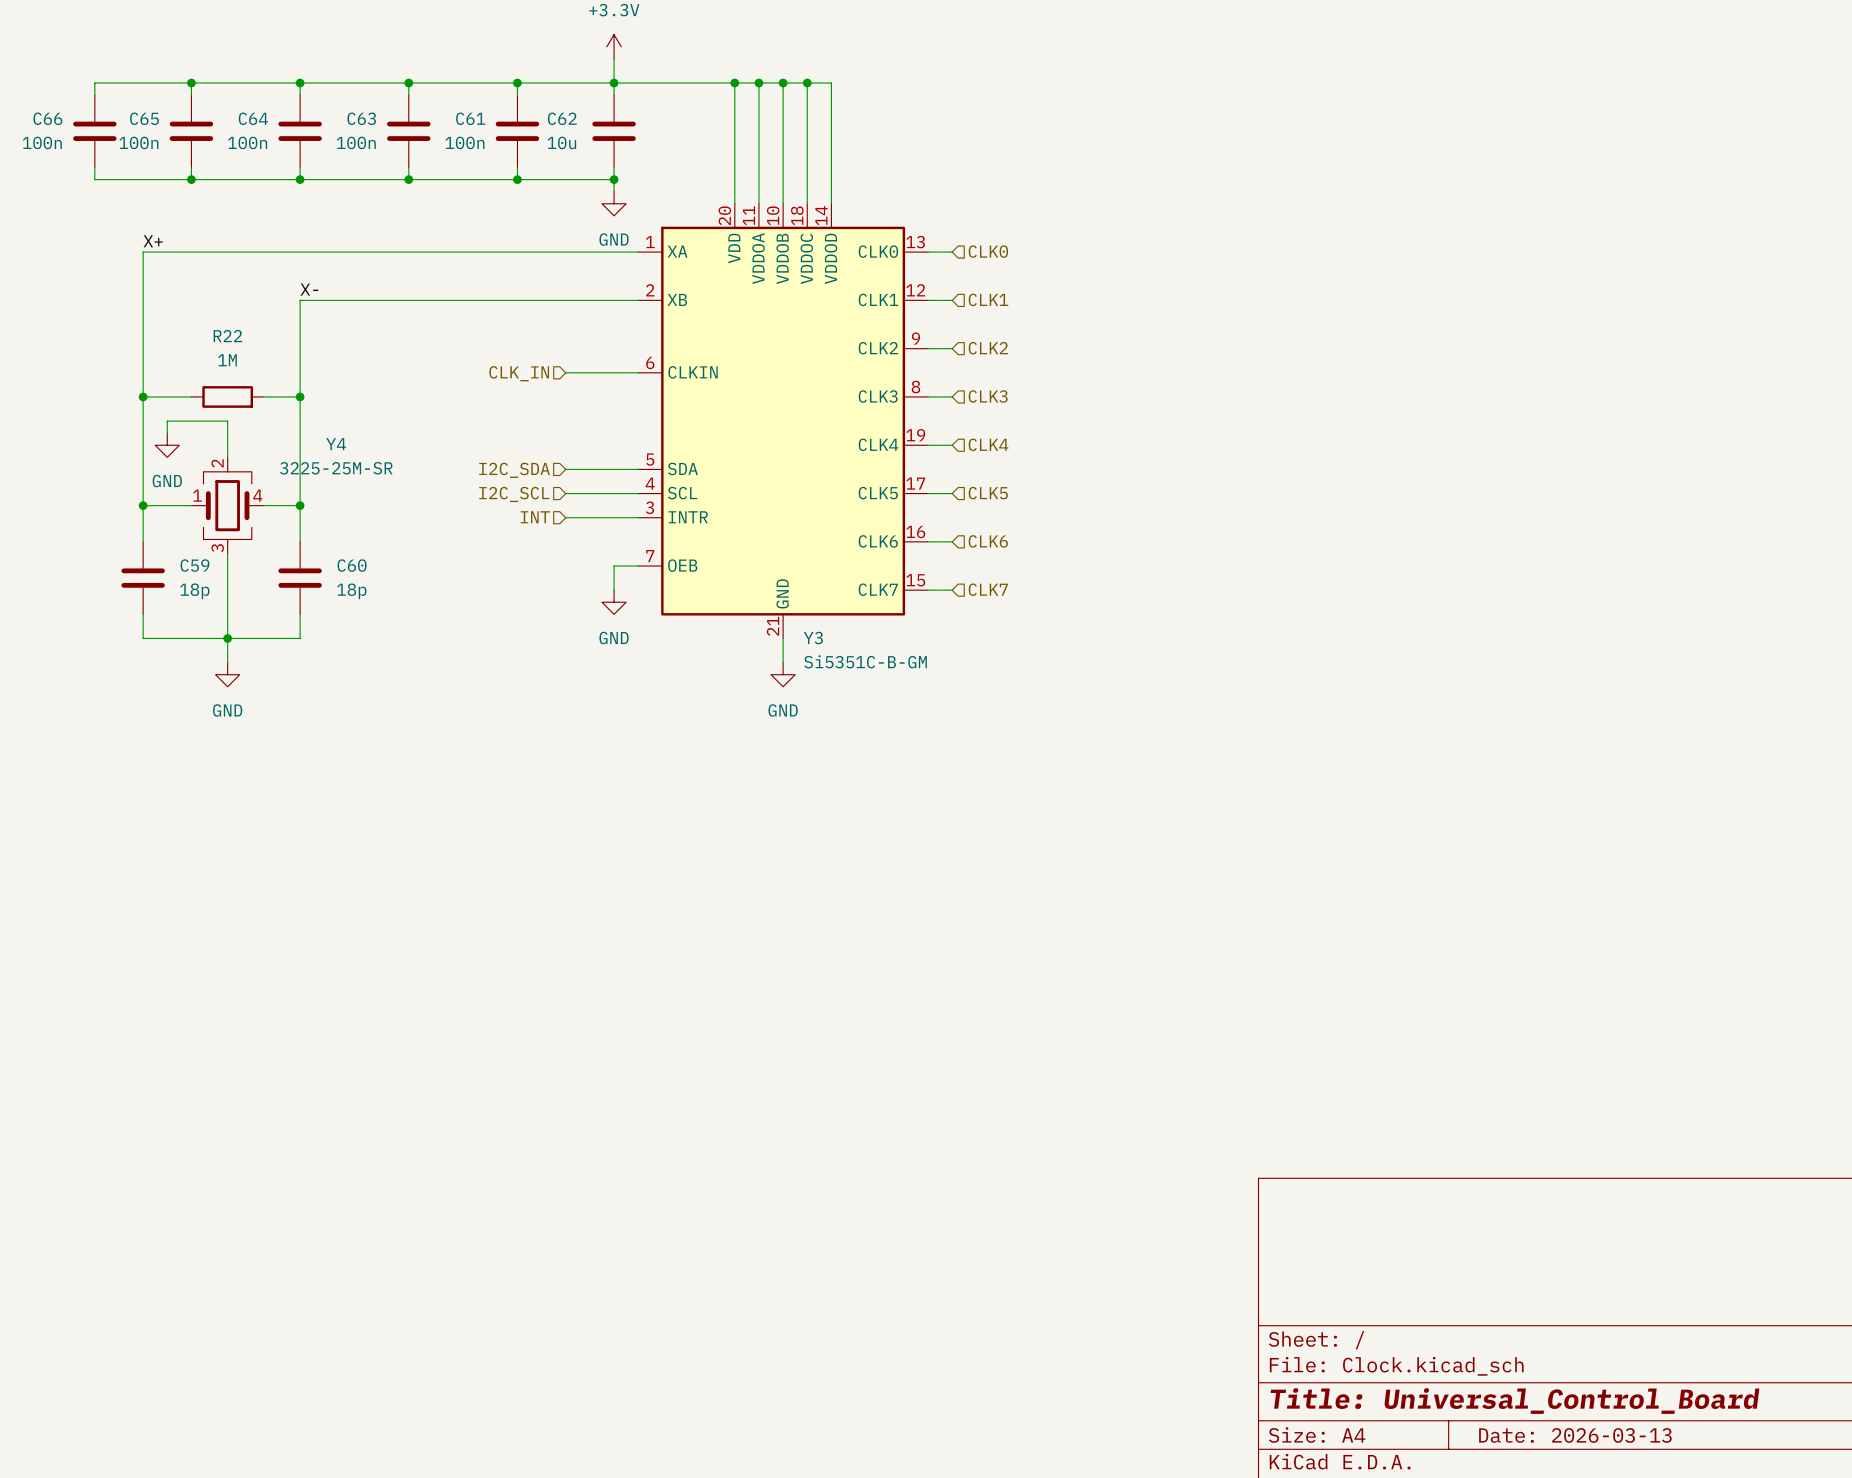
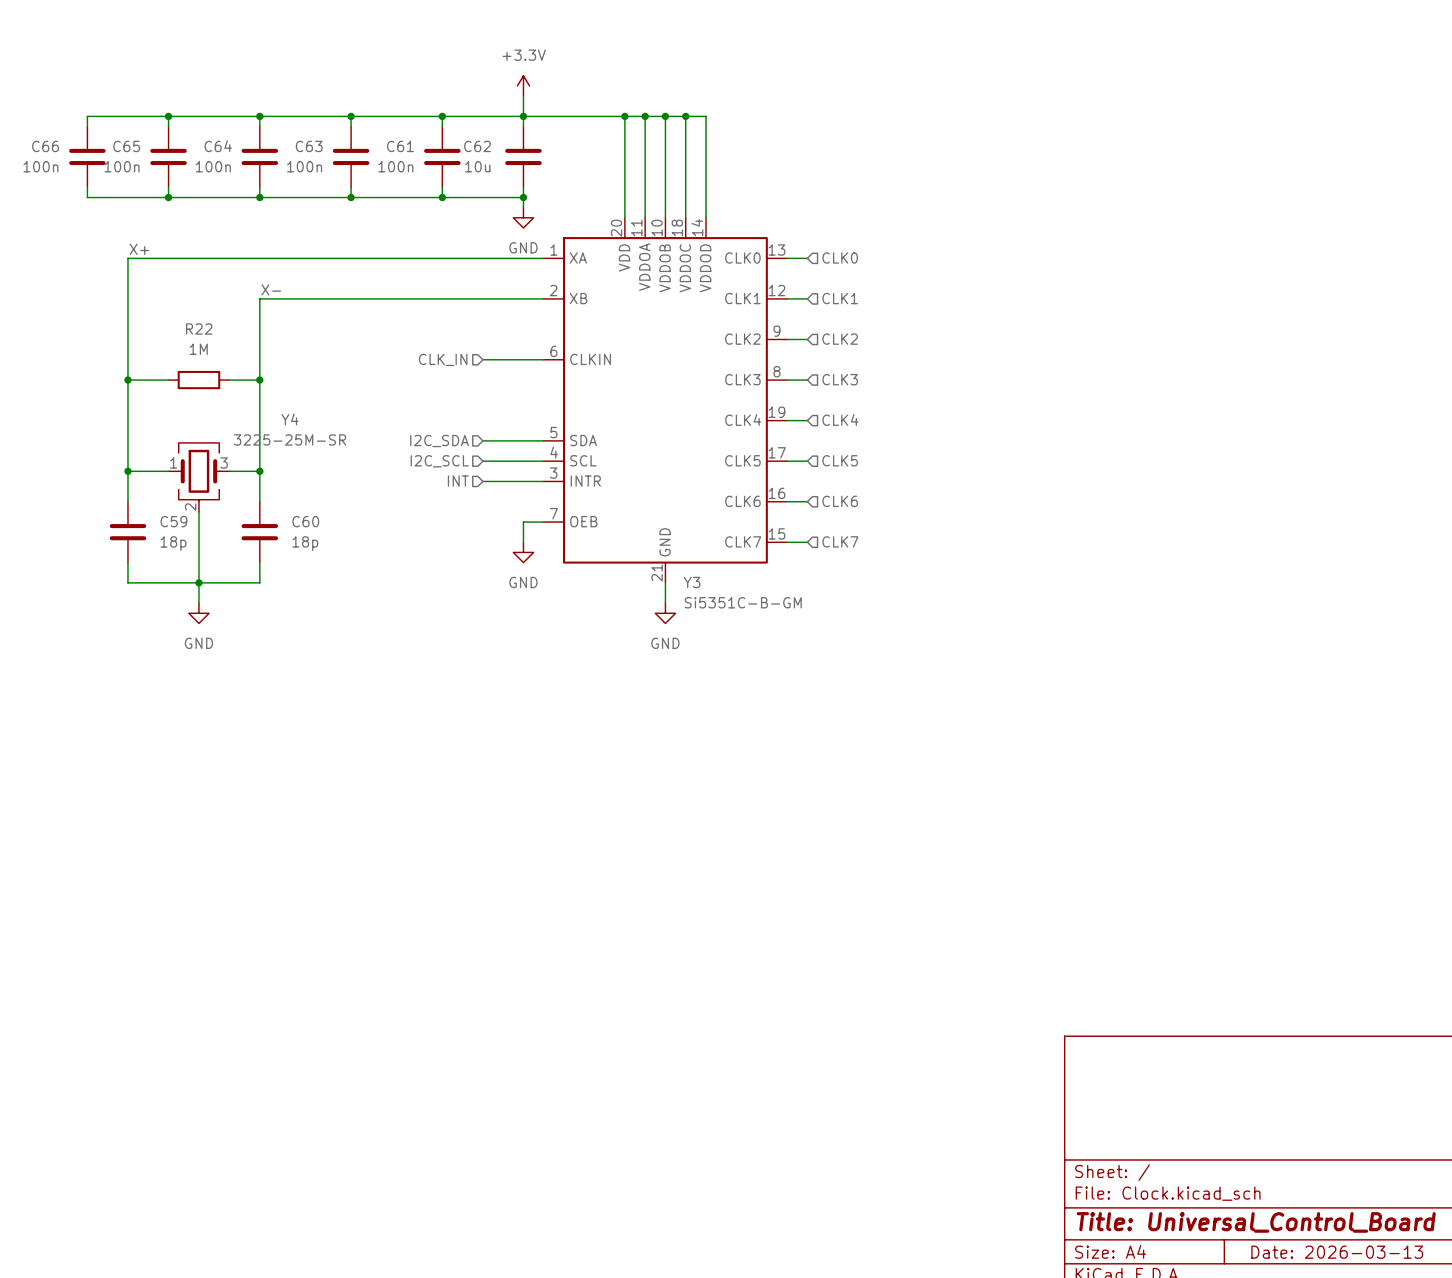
wire: (167, 433) (167, 421) (227, 421) (227, 457) -> none
power symbol: GND (167, 445) -> none
Y4 symbol: [191, 457, 264, 554] -> [168, 442, 230, 512]

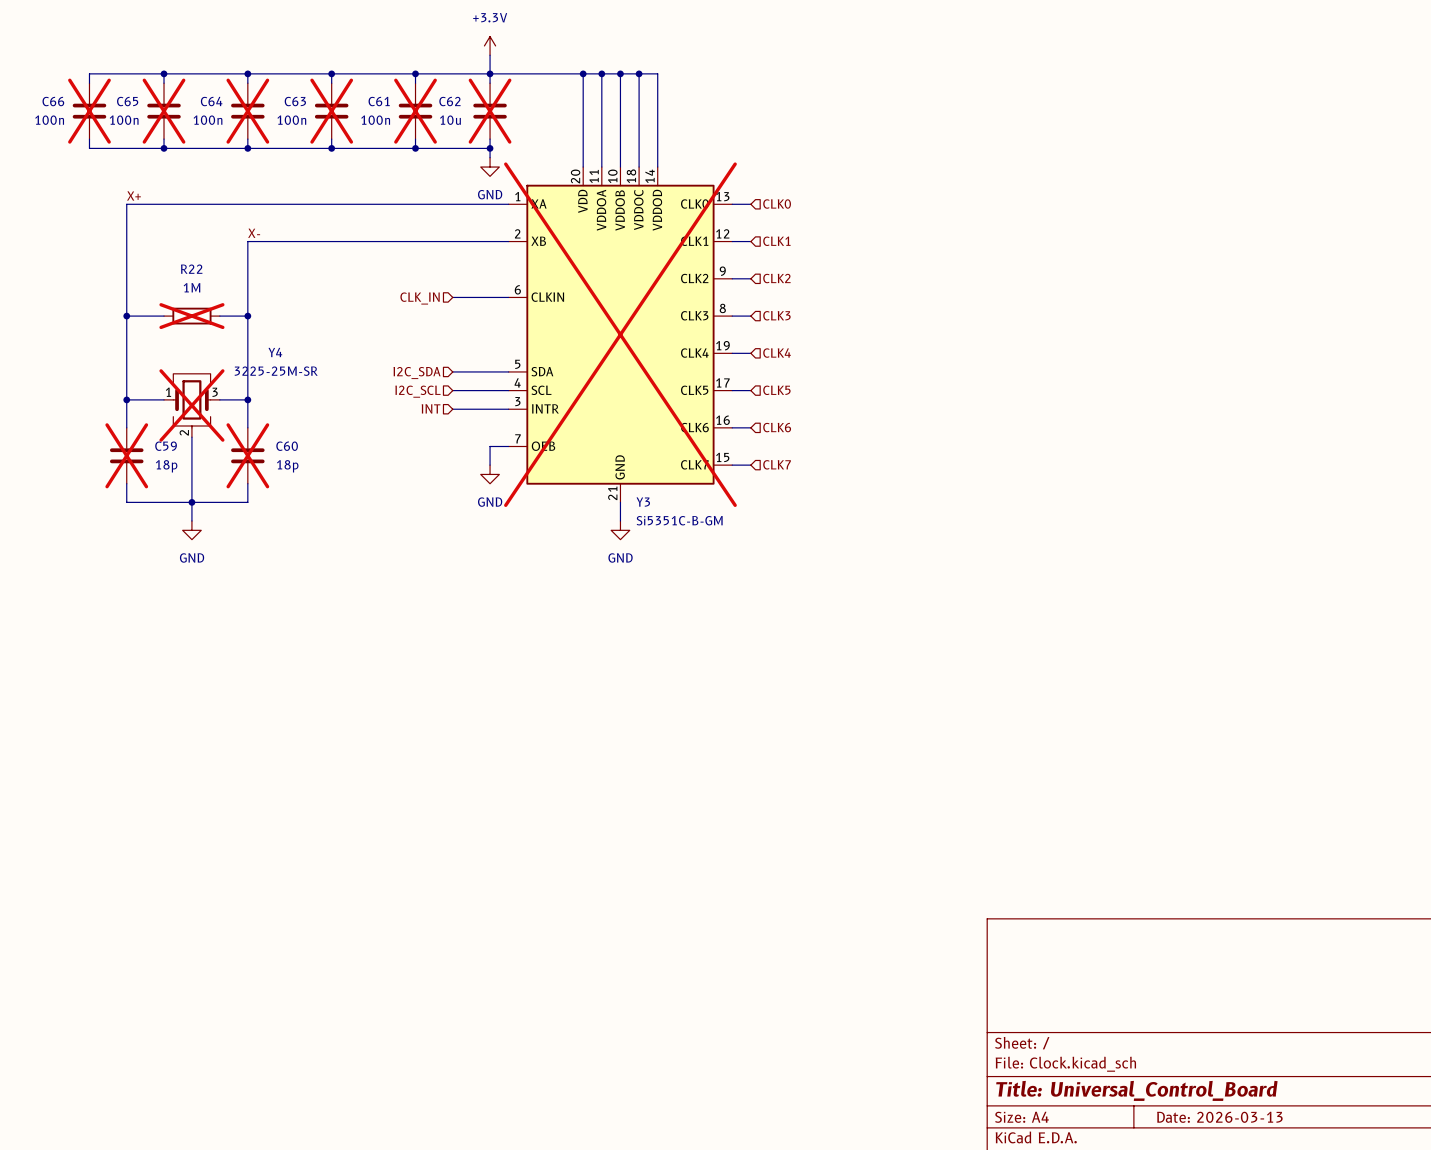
C66 do-not-place cross: none -> (89, 111)
C65 do-not-place cross: none -> (164, 111)
C64 do-not-place cross: none -> (247, 111)
C63 do-not-place cross: none -> (331, 111)
C61 do-not-place cross: none -> (415, 111)
C62 do-not-place cross: none -> (490, 111)
R22 do-not-place cross: none -> (191, 316)
Y3 do-not-place cross: none -> (620, 334)
Y4 do-not-place cross: none -> (191, 405)
C59 do-not-place cross: none -> (126, 455)
C60 do-not-place cross: none -> (247, 455)

